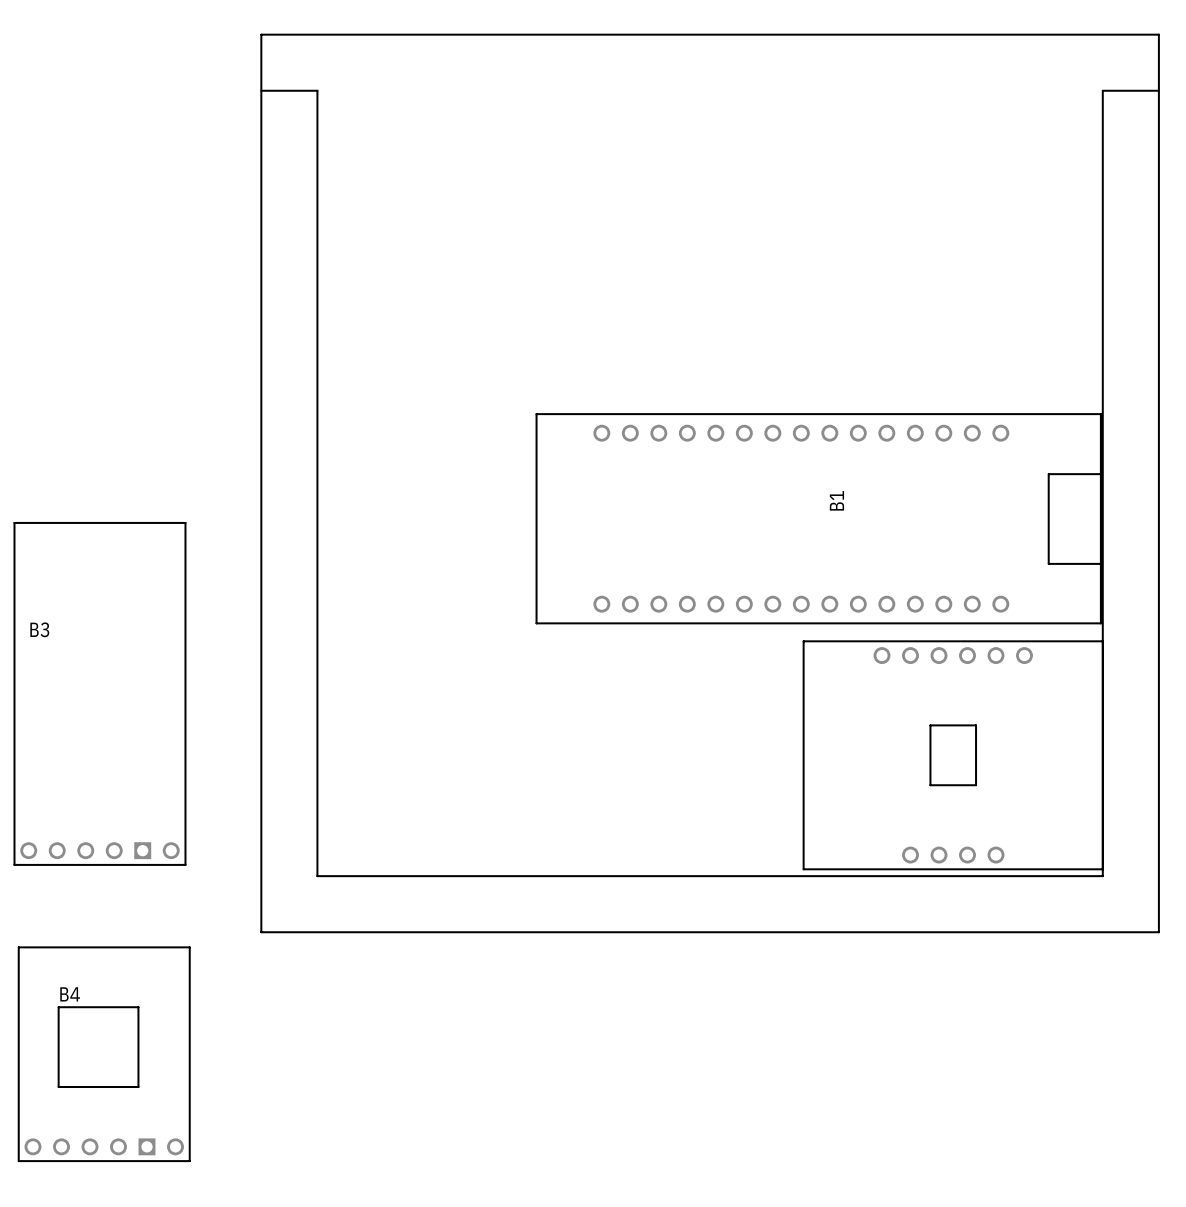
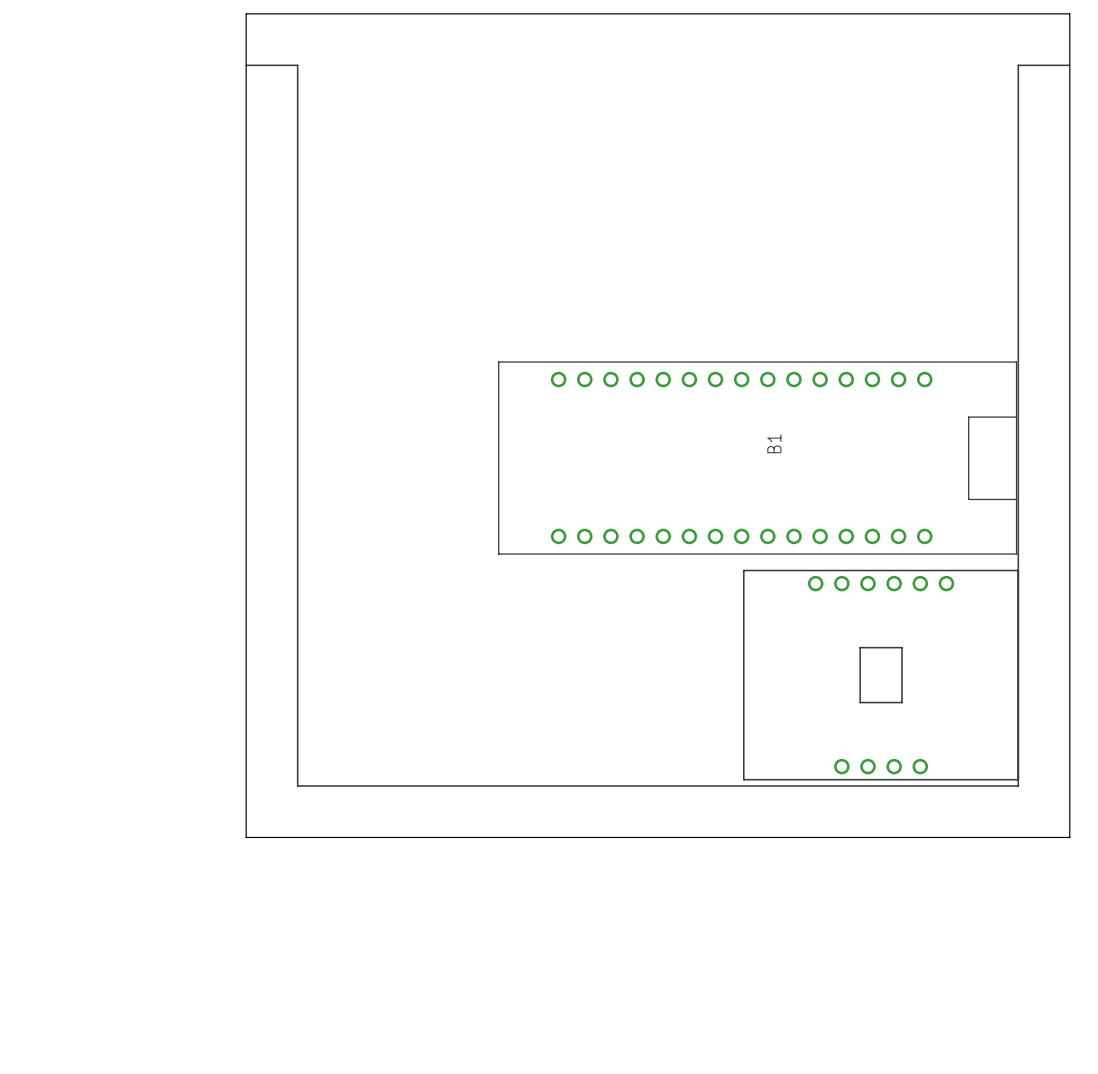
B3: (99, 693) -> none
B4: (104, 1054) -> none

